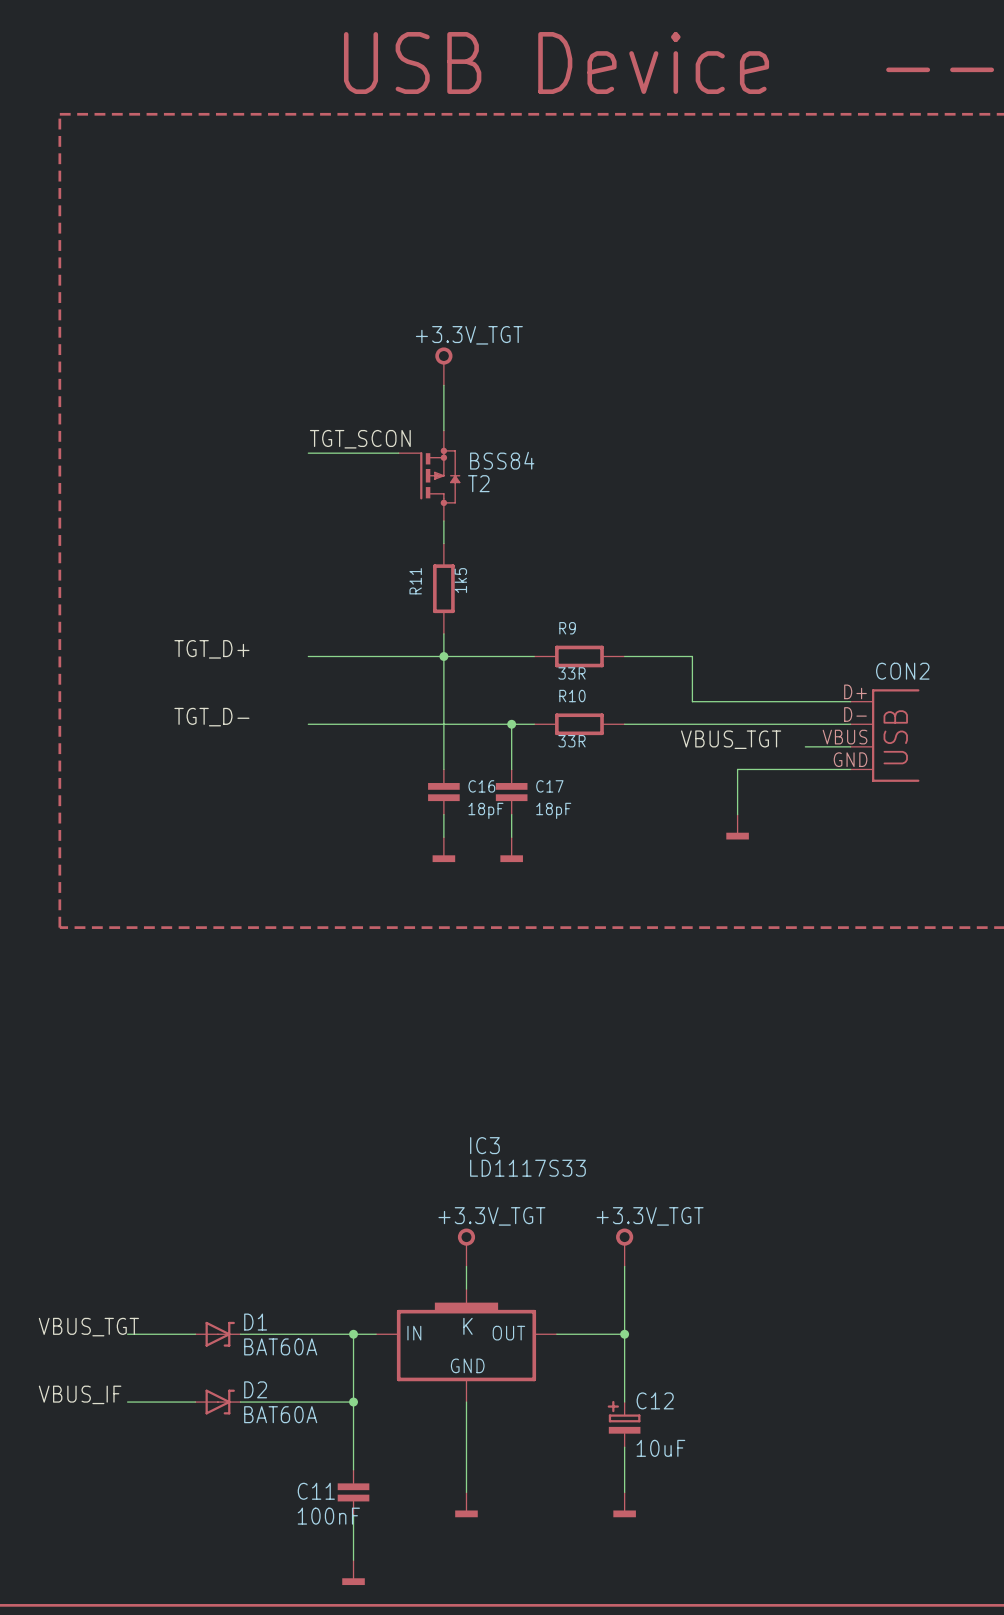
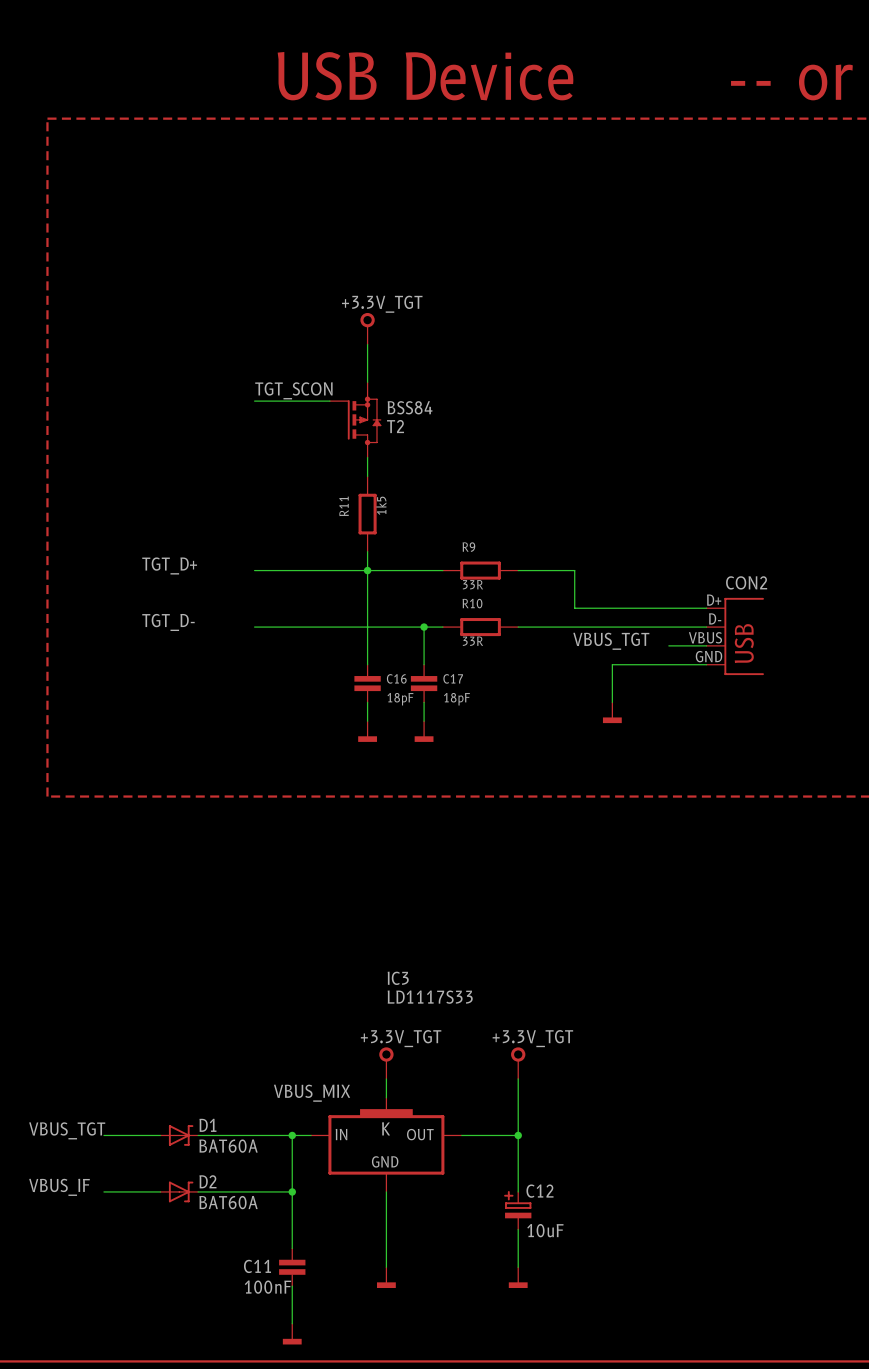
label: none -> VBUS_MIX (312, 1093)

